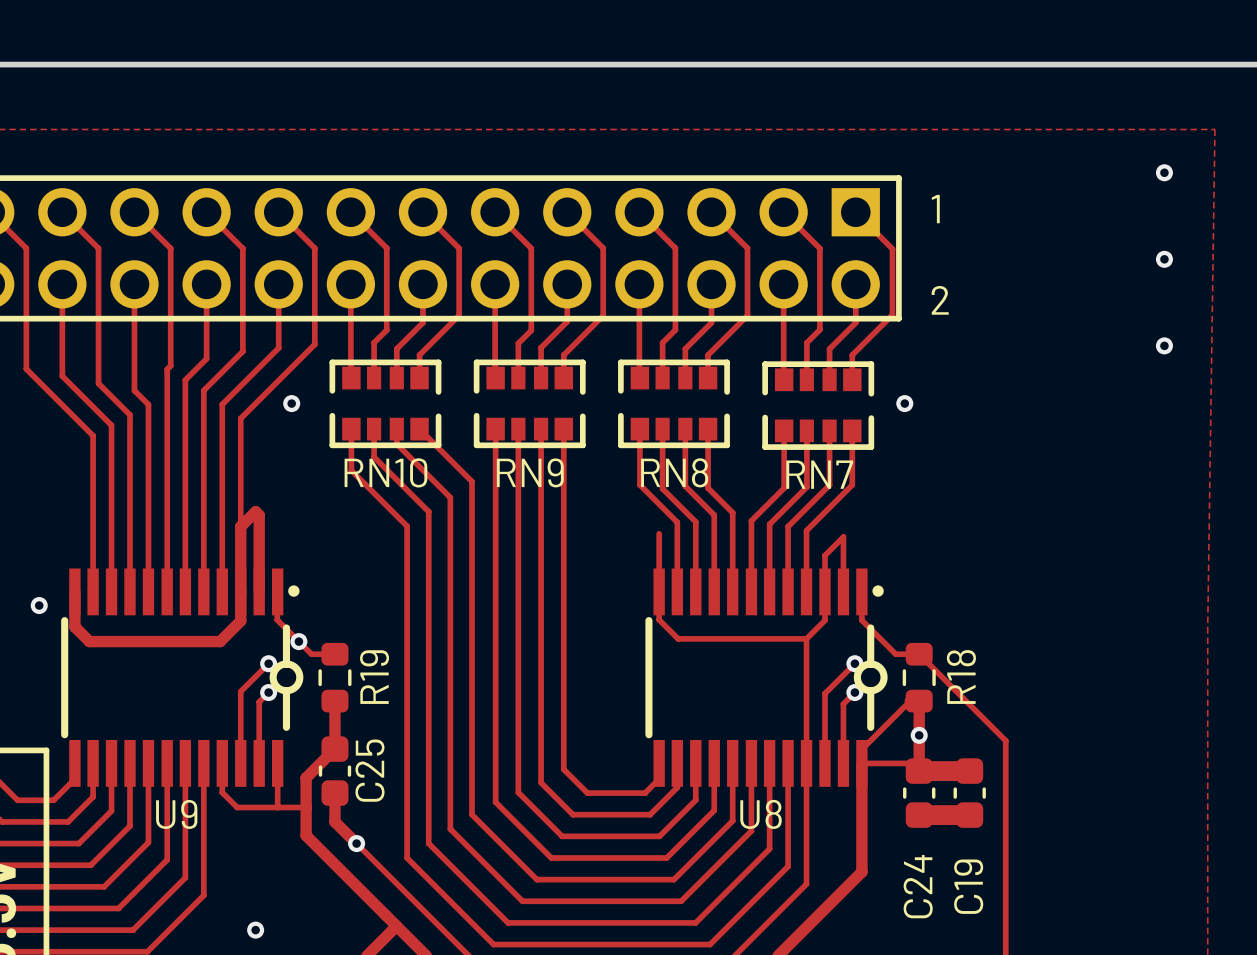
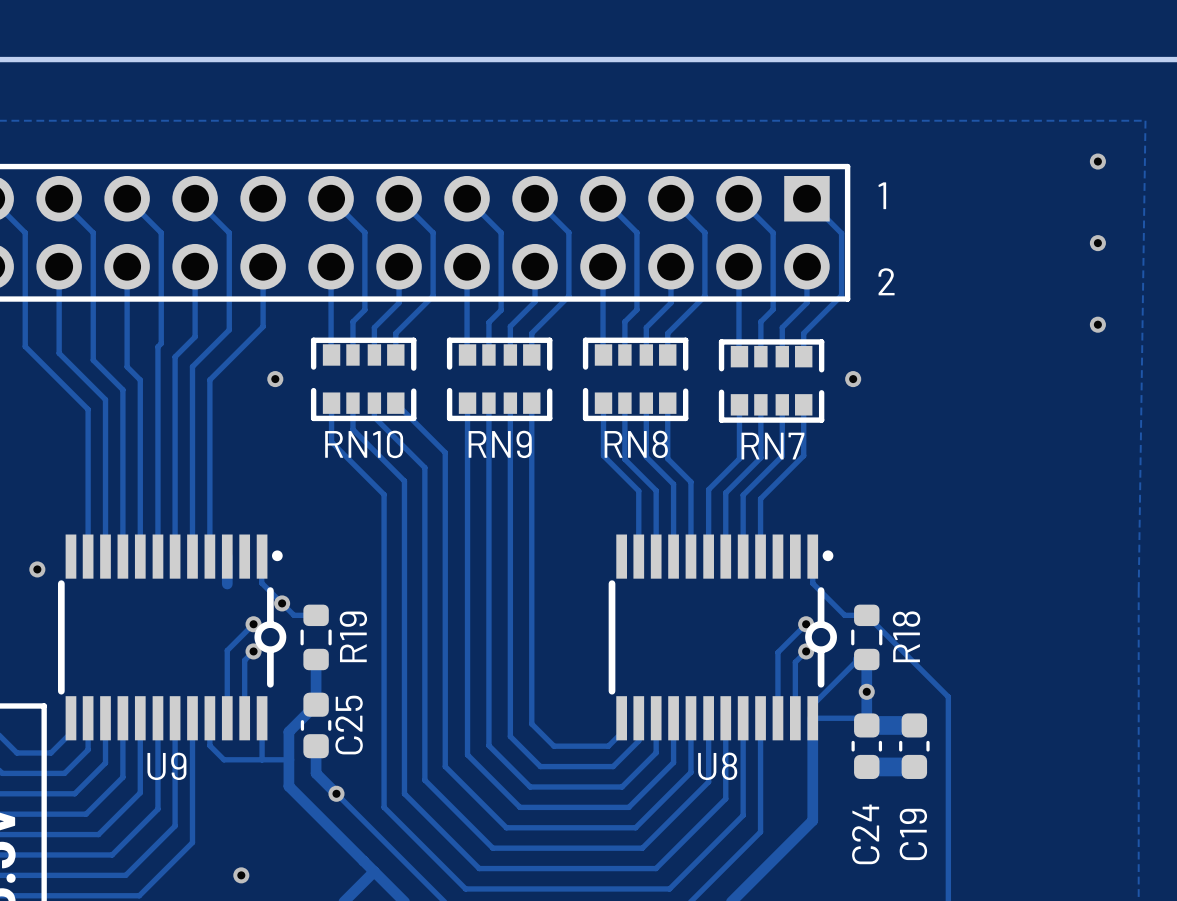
track: (278, 212) (314, 248) (314, 344) (240, 418) (240, 591) (240, 526) (255, 511) (259, 515) (259, 591) -> none
track: (659, 533) (659, 619) (678, 638) (806, 638) -> none
track: (74, 591) (74, 626) (89, 641) (220, 641) (240, 621) -> none
track: (843, 591) (843, 537) (825, 555) (825, 620) (806, 638) -> none
track: (806, 638) (806, 763) -> none

